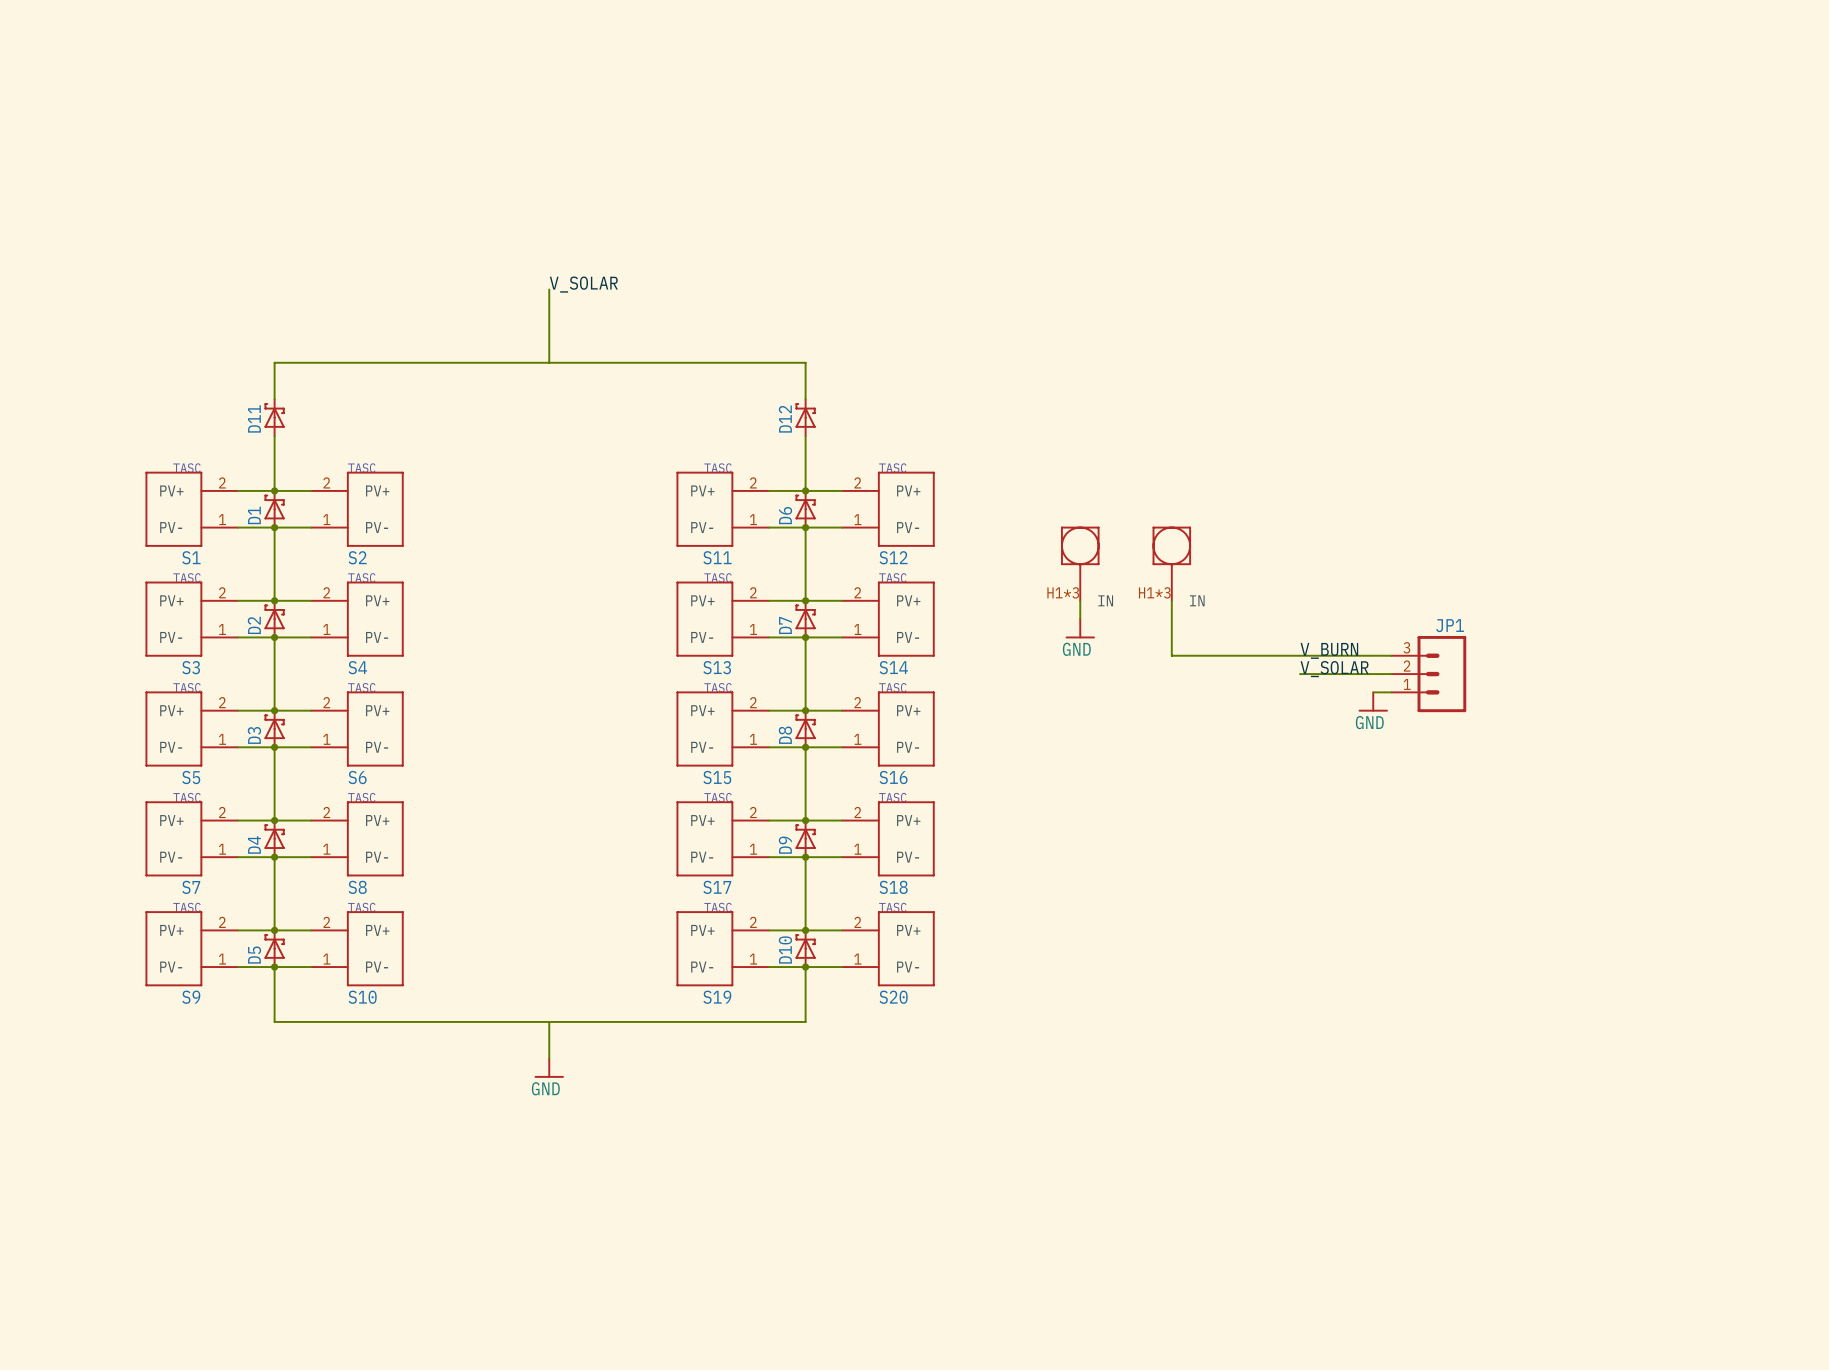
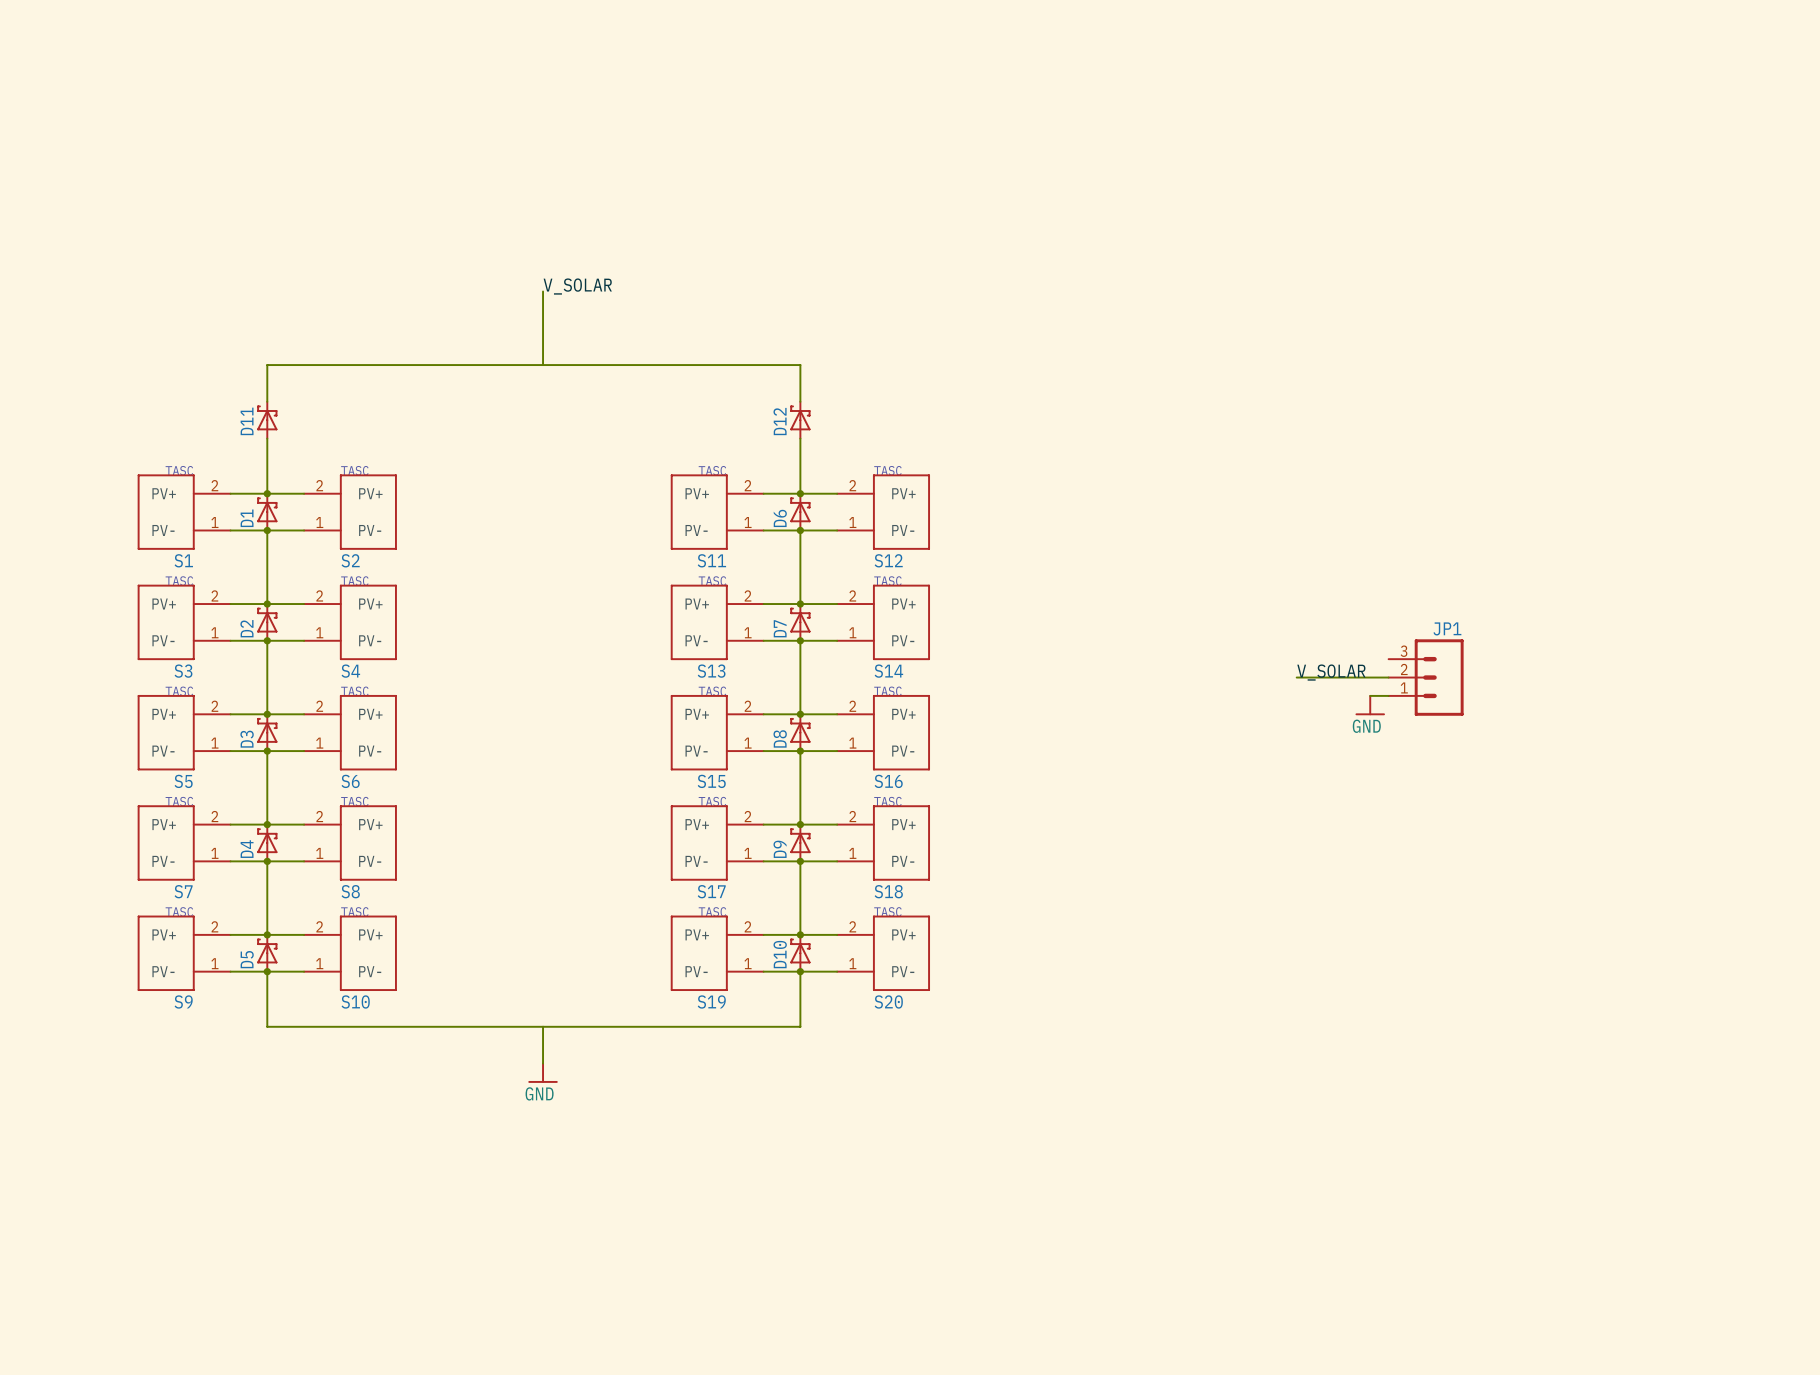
part: (1080, 564) -> none
part: (1171, 564) -> none
wire: (1080, 600) (1080, 619) -> none
wire: (1171, 600) (1171, 655) (1391, 655) -> none
power symbol: GND (1080, 628) -> none
label: V_BURN (1329, 650) -> none

